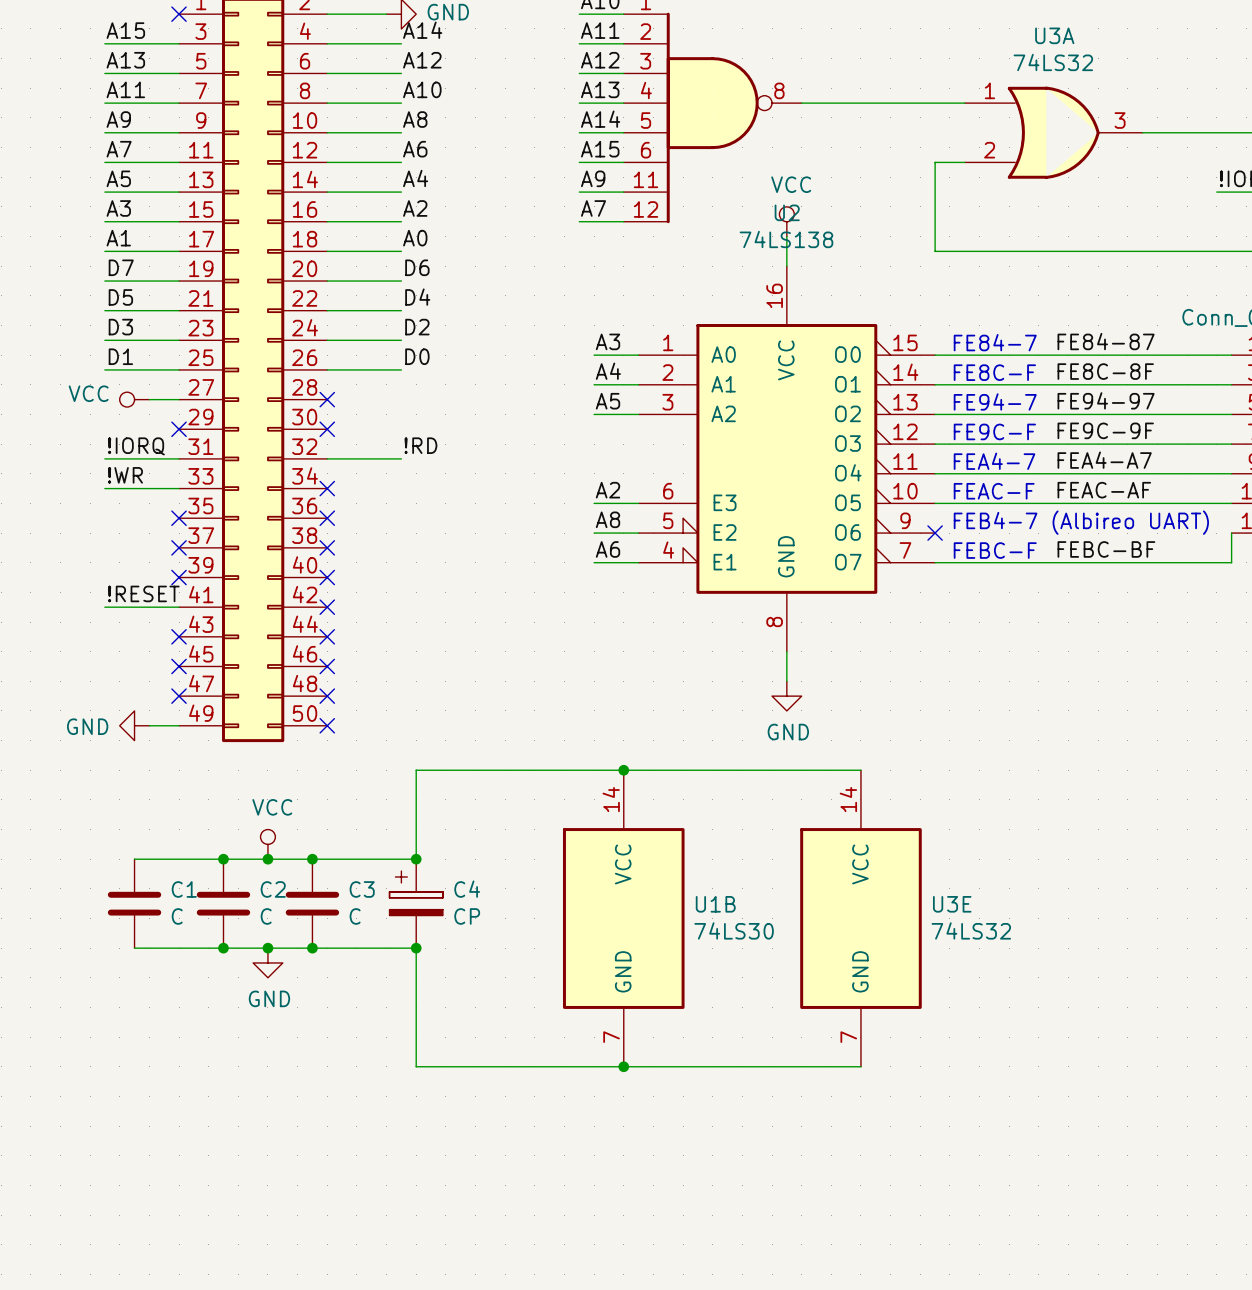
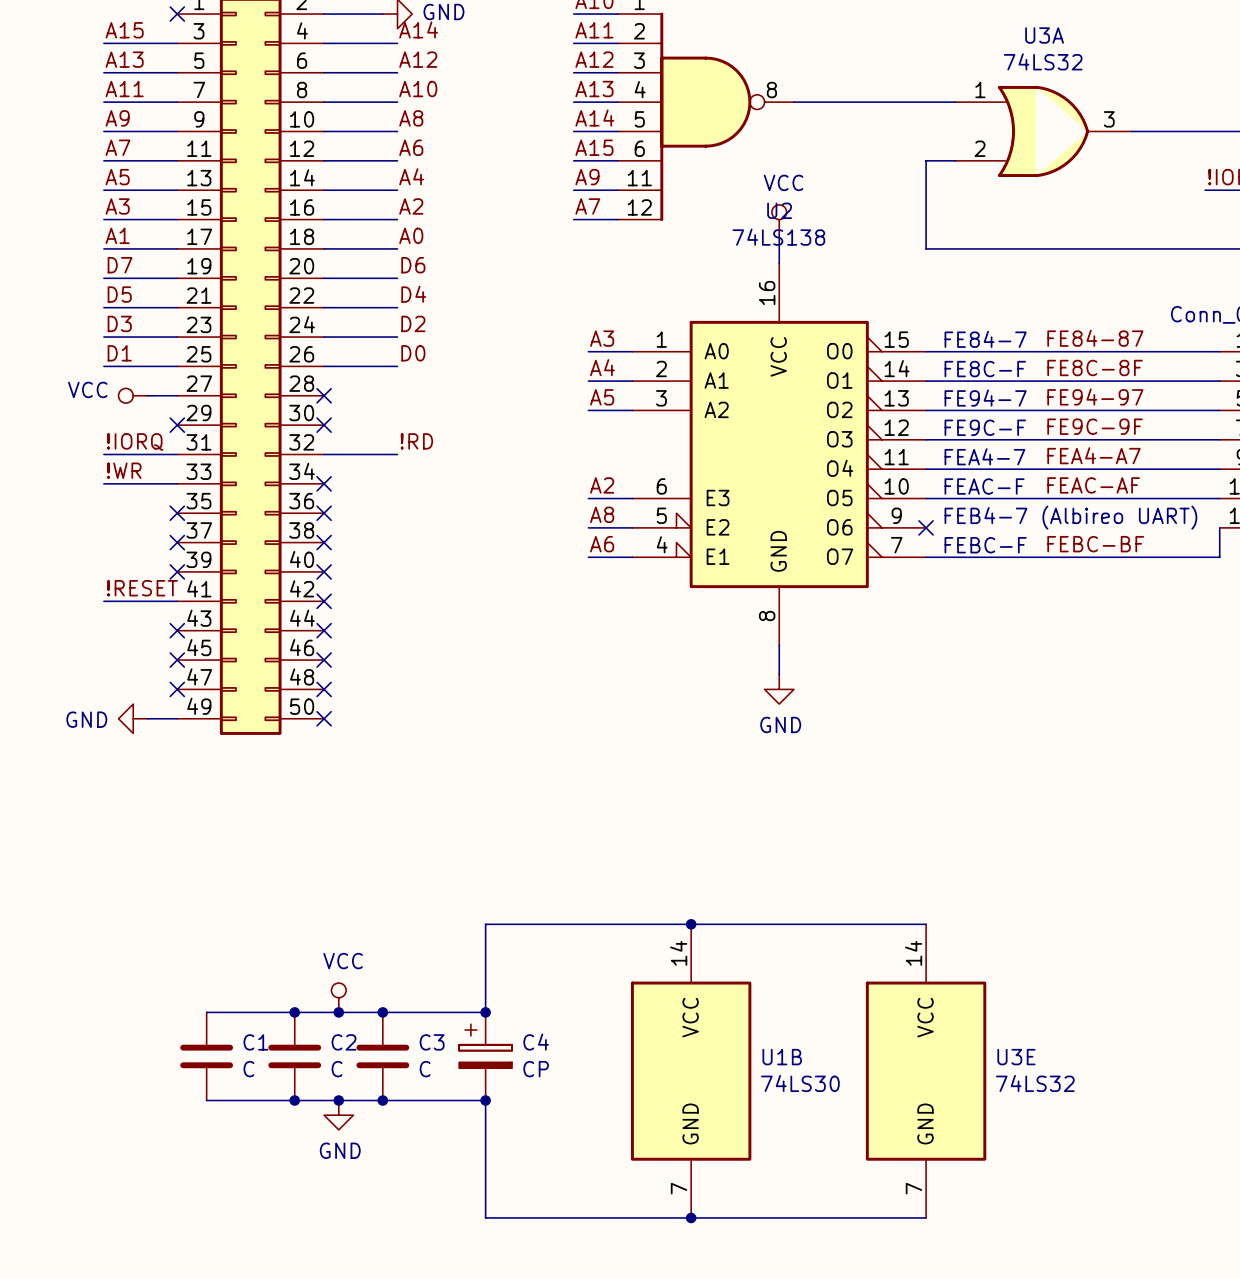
junction: (623, 770) -> none
wire: (860, 770) (416, 770) (416, 859) (134, 859) -> (926, 924) (485, 924) (485, 1012) (206, 1012)
power symbol position: VCC (267, 844) -> VCC (338, 997)
junction: (223, 859) -> none
junction: (267, 859) -> none
junction: (312, 859) -> none
junction: (416, 859) -> none
C1 position: (134, 903) -> (206, 1056)
C2 position: (223, 903) -> (294, 1056)
C3 position: (312, 903) -> (382, 1056)
C4 position: (416, 903) -> (485, 1056)
U1B position: (623, 918) -> (691, 1071)
U3E position: (860, 918) -> (926, 1071)
junction: none -> (691, 924)
wire: (134, 948) (416, 948) (416, 1066) (860, 1066) -> (206, 1100) (485, 1100) (485, 1217) (926, 1217)
junction: (223, 948) -> none
junction: (267, 948) -> none
junction: (312, 948) -> none
junction: (416, 948) -> none
power symbol position: GND (267, 962) -> GND (338, 1115)
junction: none -> (294, 1012)
junction: none -> (338, 1012)
junction: none -> (382, 1012)
junction: none -> (485, 1012)
junction: (623, 1066) -> none
junction: none -> (294, 1100)
junction: none -> (338, 1100)
junction: none -> (382, 1100)
junction: none -> (485, 1100)
junction: none -> (691, 1217)

